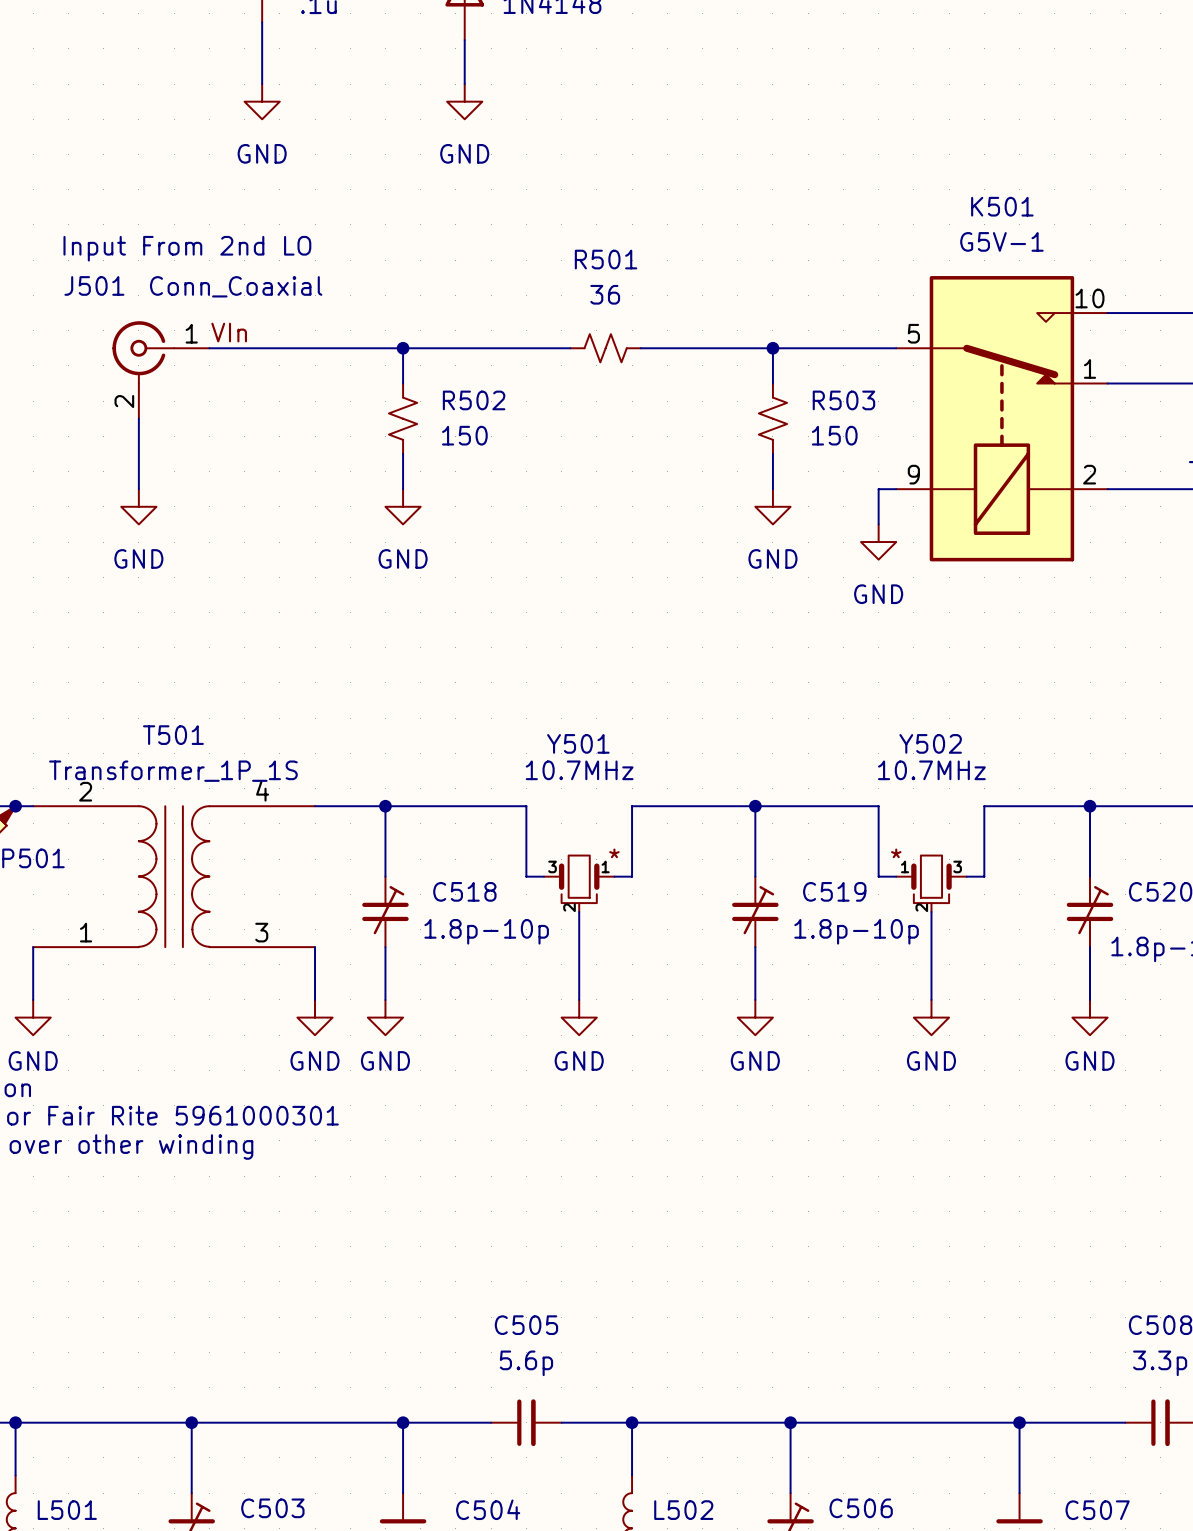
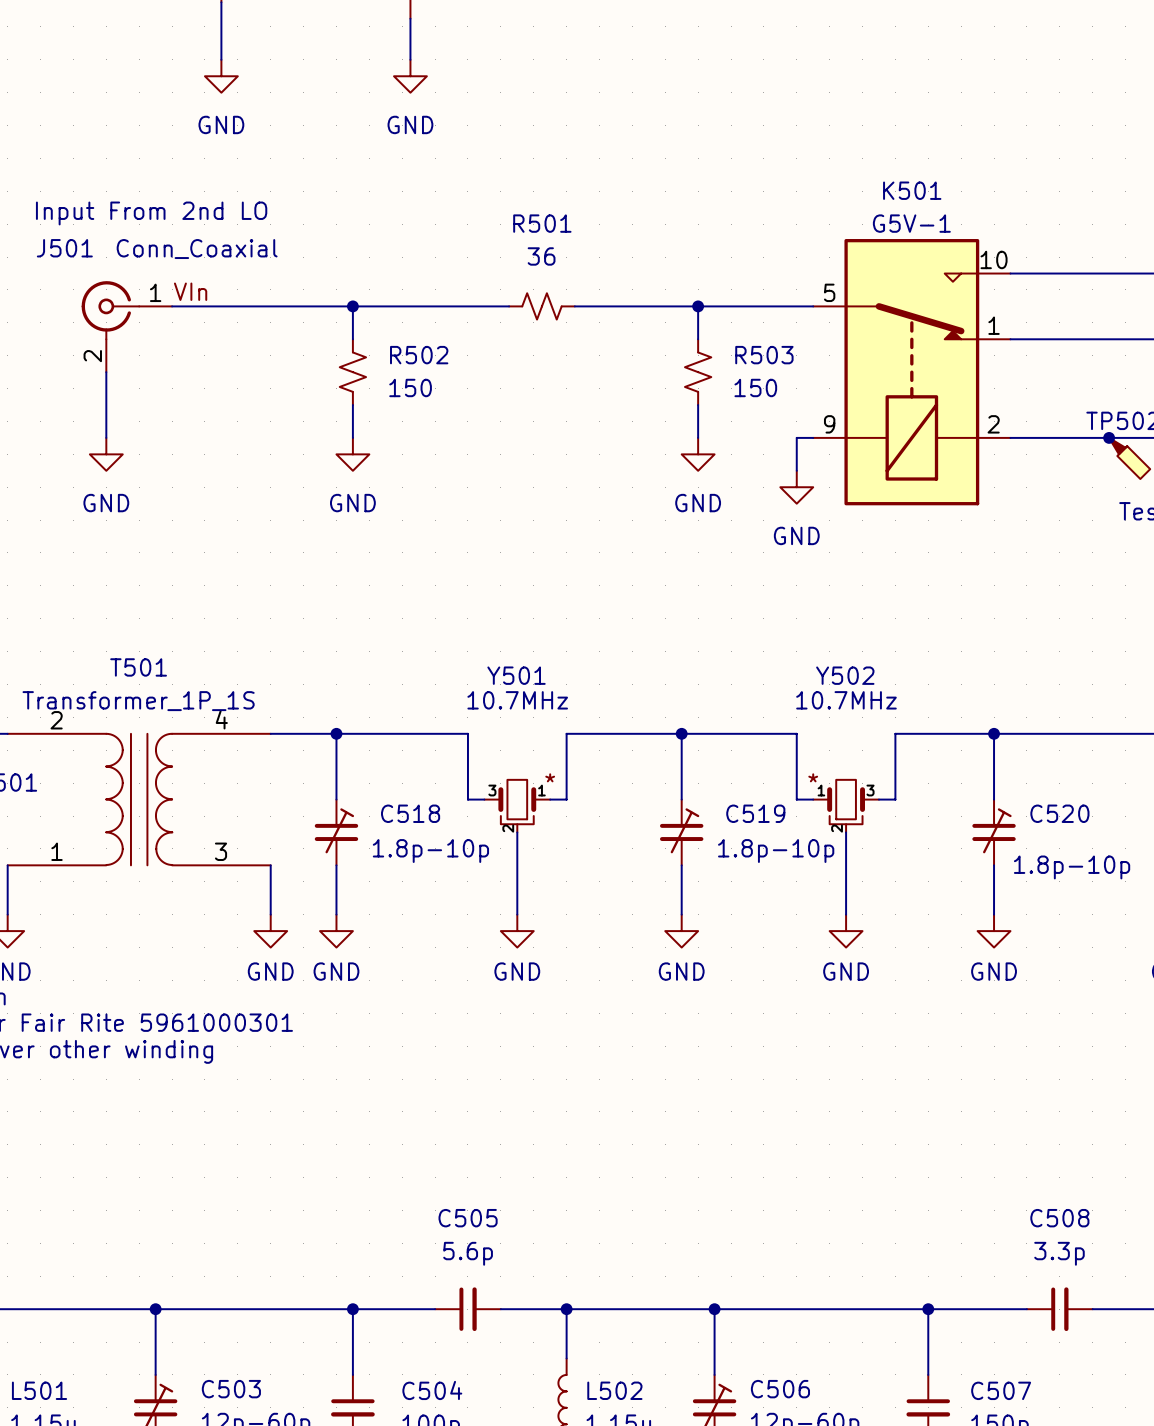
K501 name position: K501 (1002, 206) -> K501 (912, 190)
K501 value position: G5V-1 (1001, 241) -> G5V-1 (911, 223)

